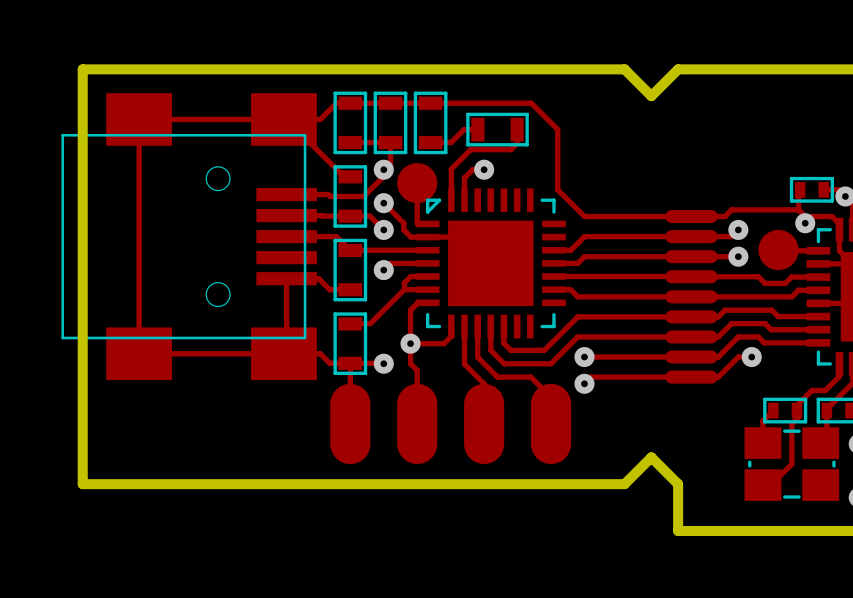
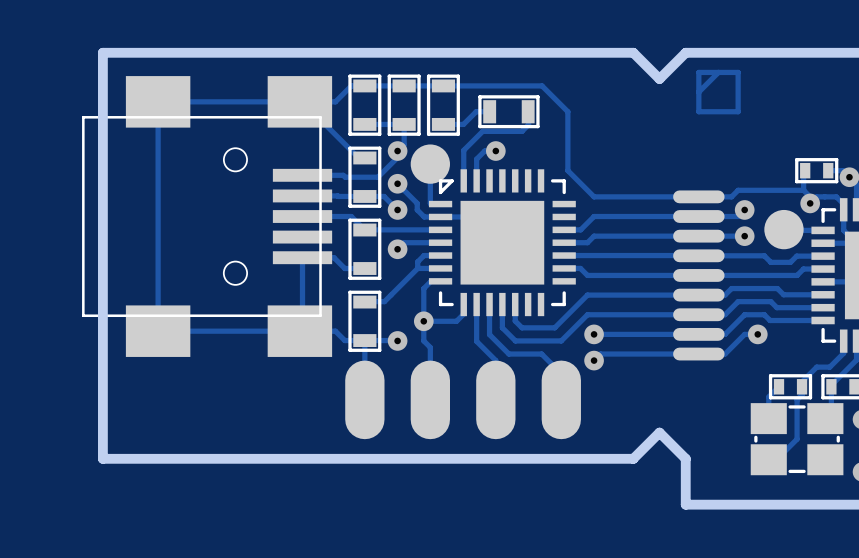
track: none -> (698, 72) (698, 111) (738, 111) (738, 72) (698, 72)
track: none -> (718, 72) (698, 92)

